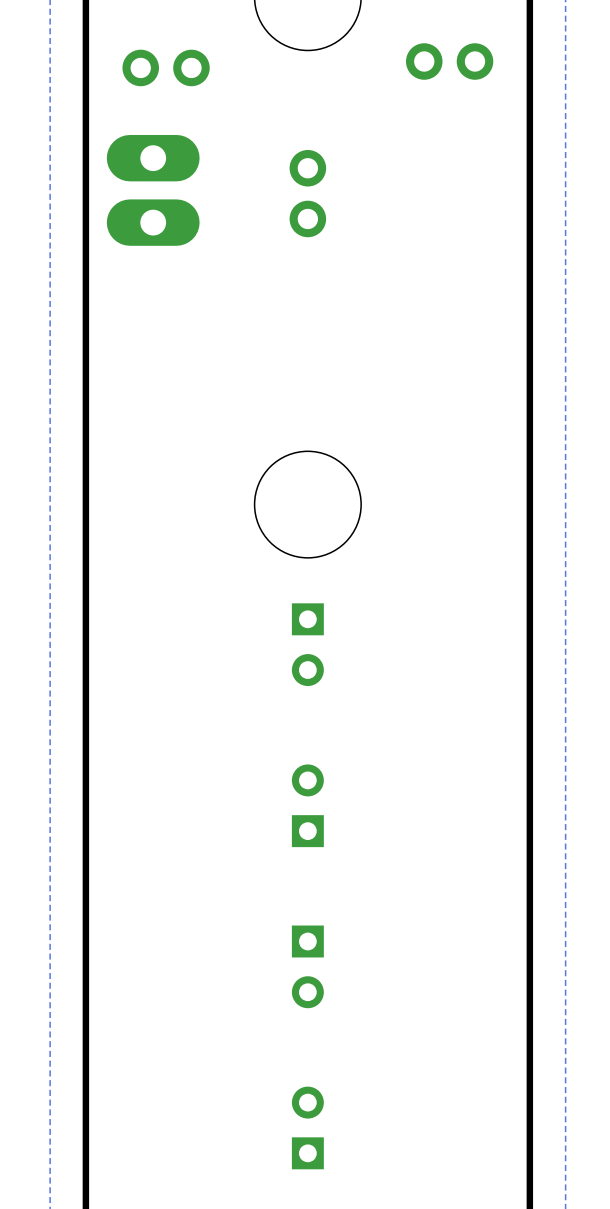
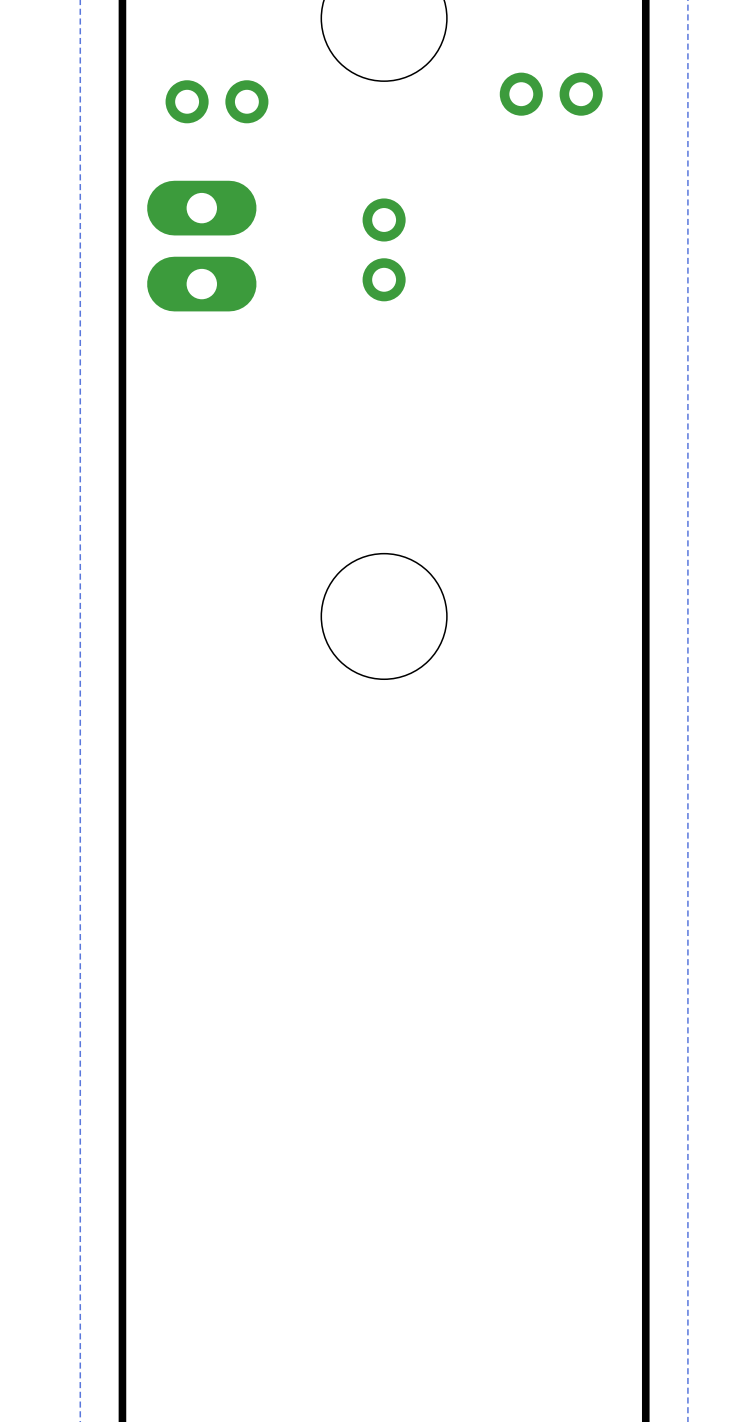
part: (307, 644) -> none
part: (307, 805) -> none
part: (307, 966) -> none
part: (307, 1127) -> none

